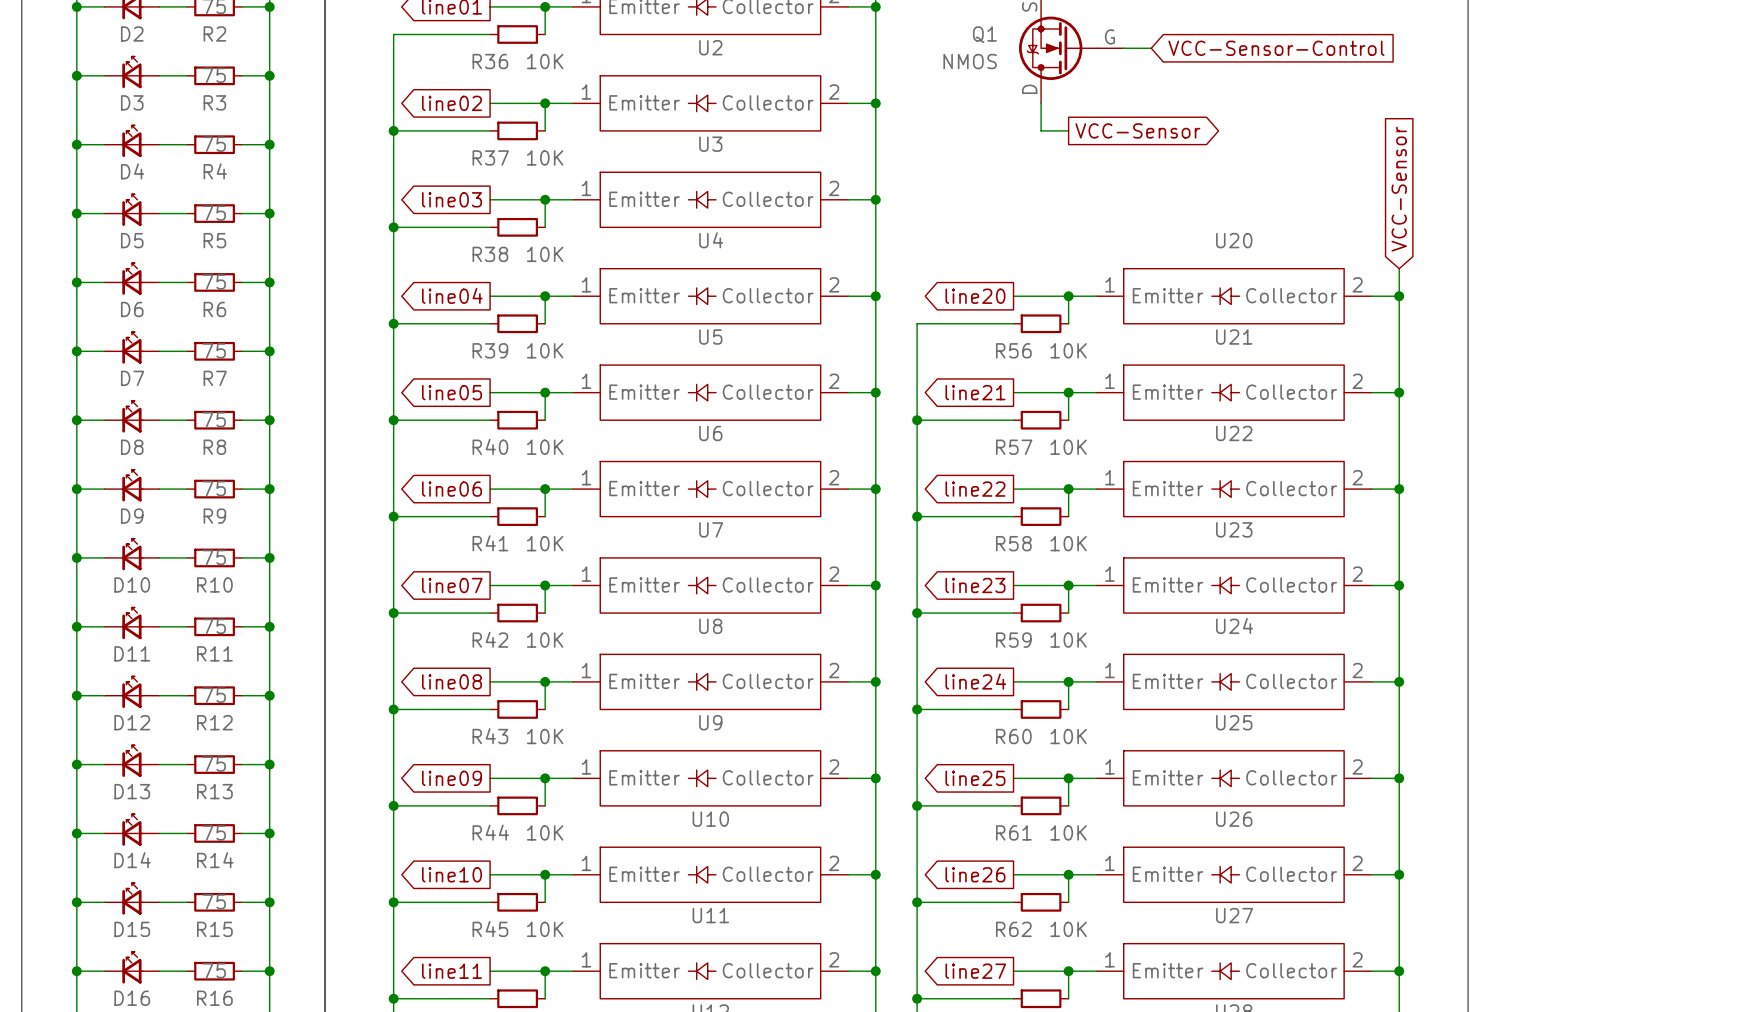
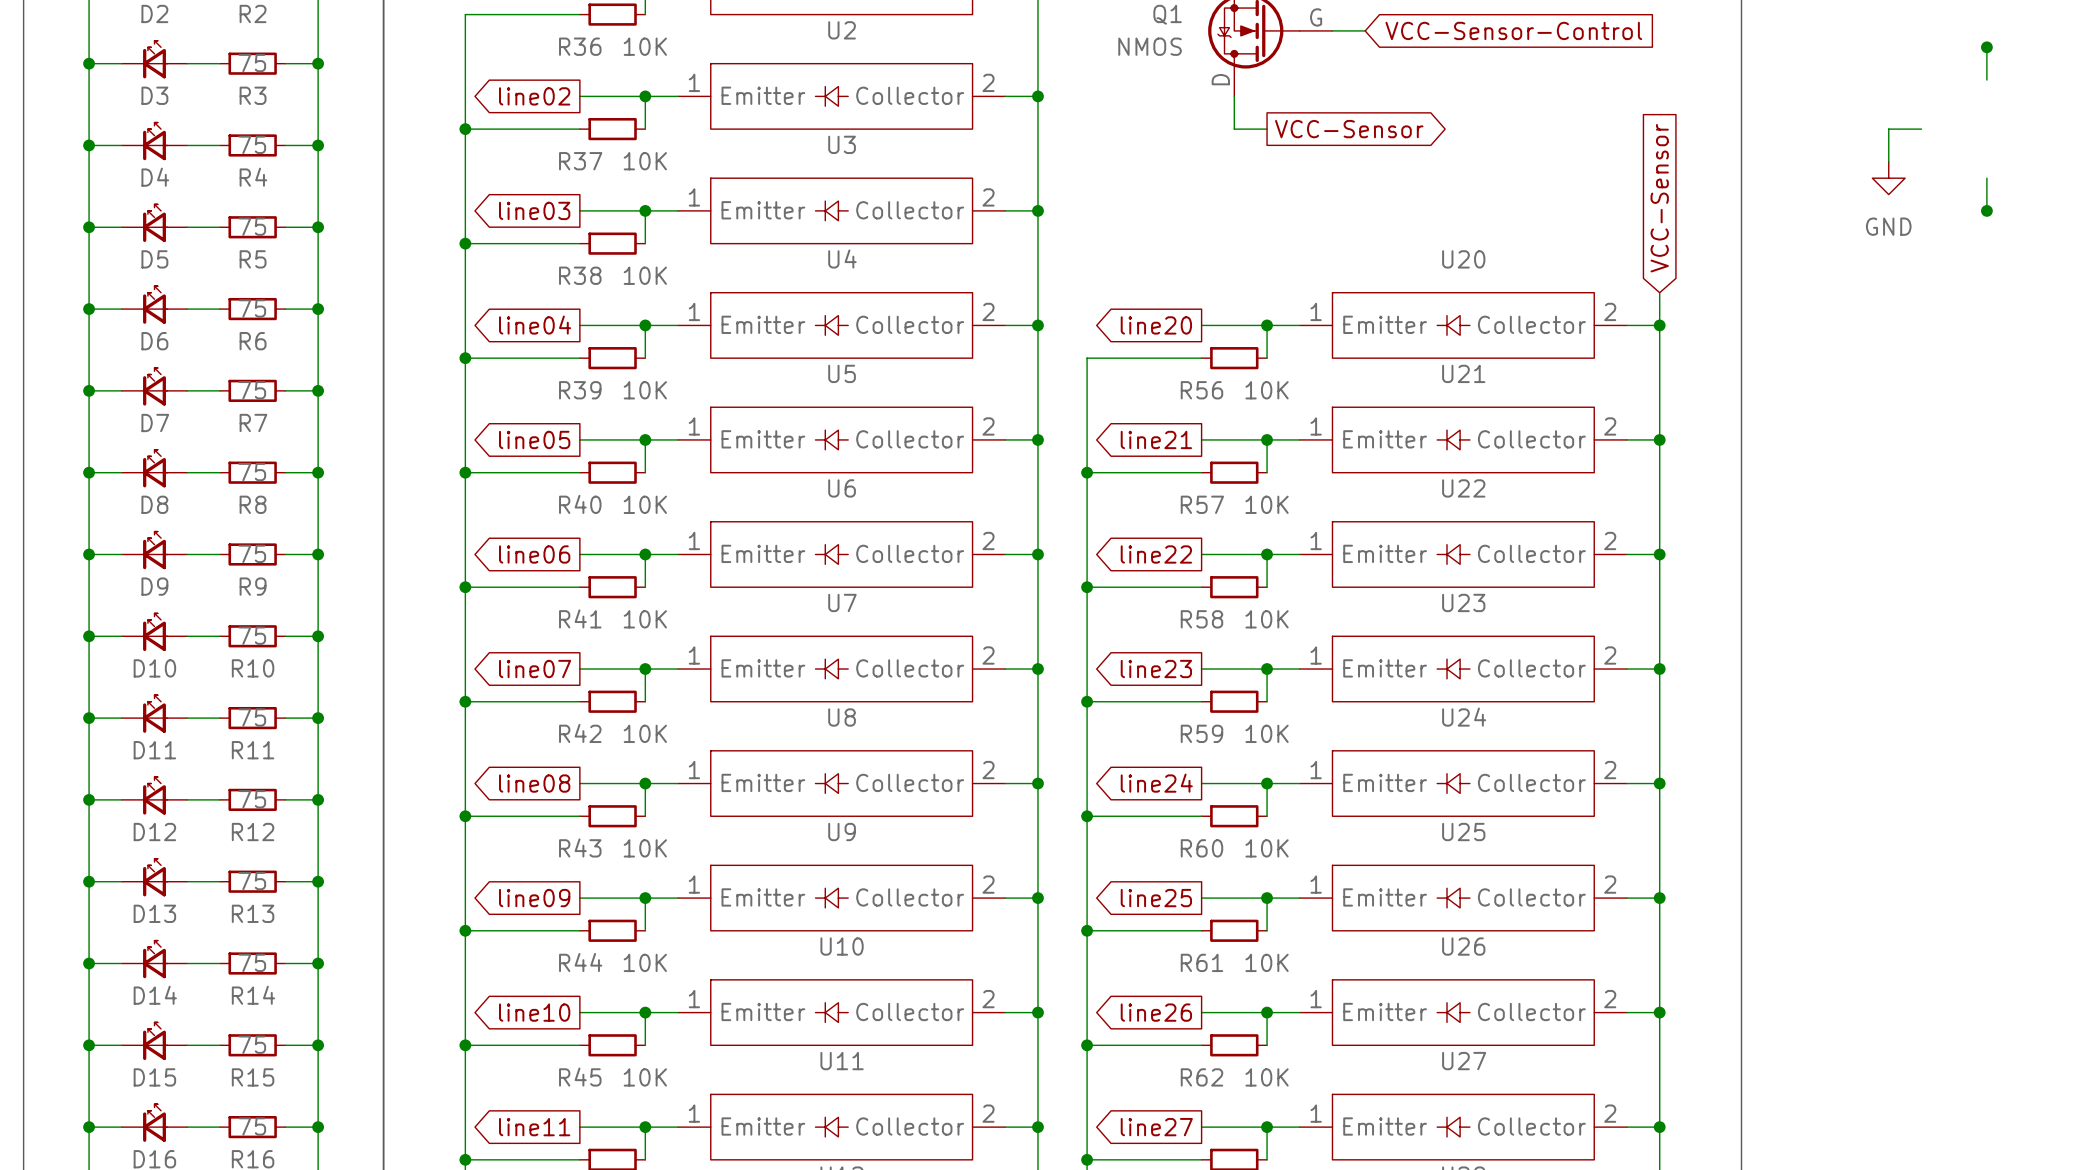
wire: none -> (1986, 47) (1986, 80)
junction: none -> (1986, 47)
wire: none -> (1921, 129) (1888, 129) (1888, 161)
power symbol: none -> GND (1888, 178)
wire: none -> (1986, 178) (1986, 210)
junction: none -> (1986, 210)

